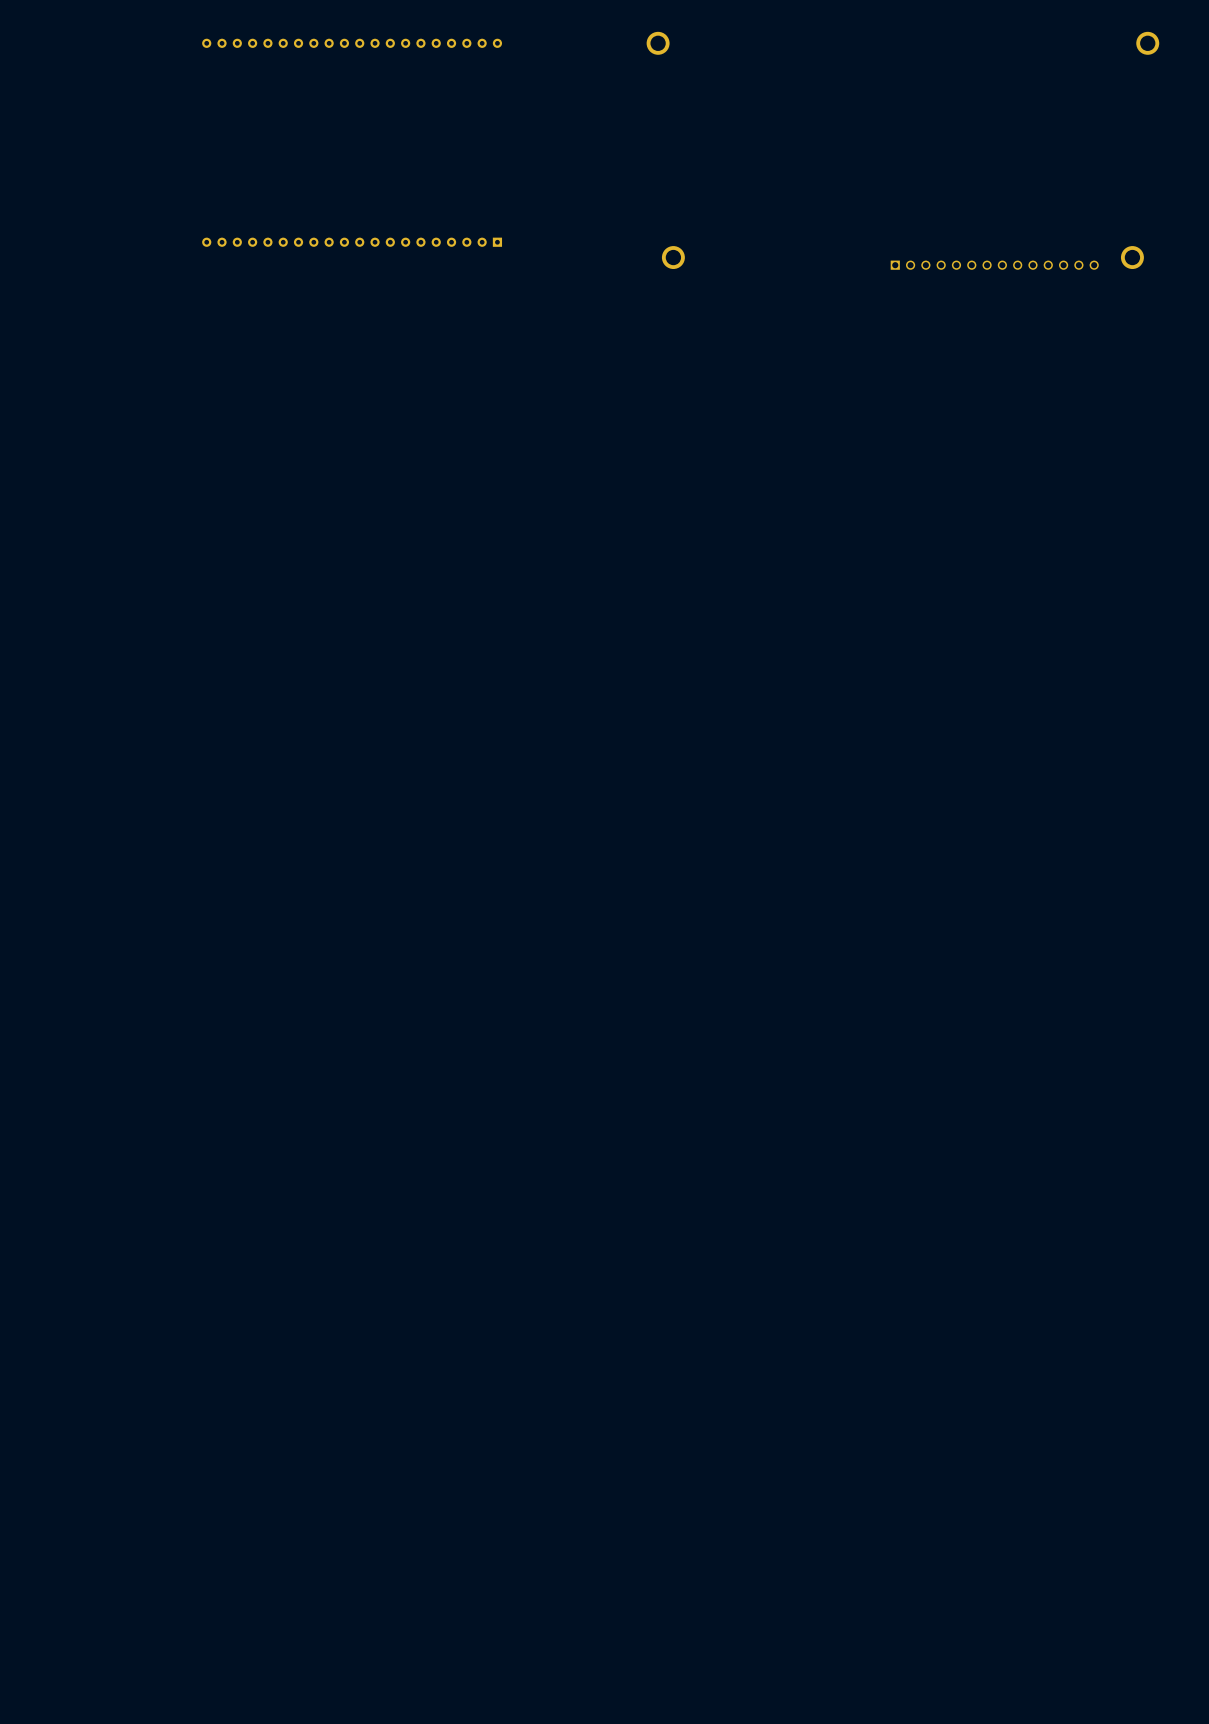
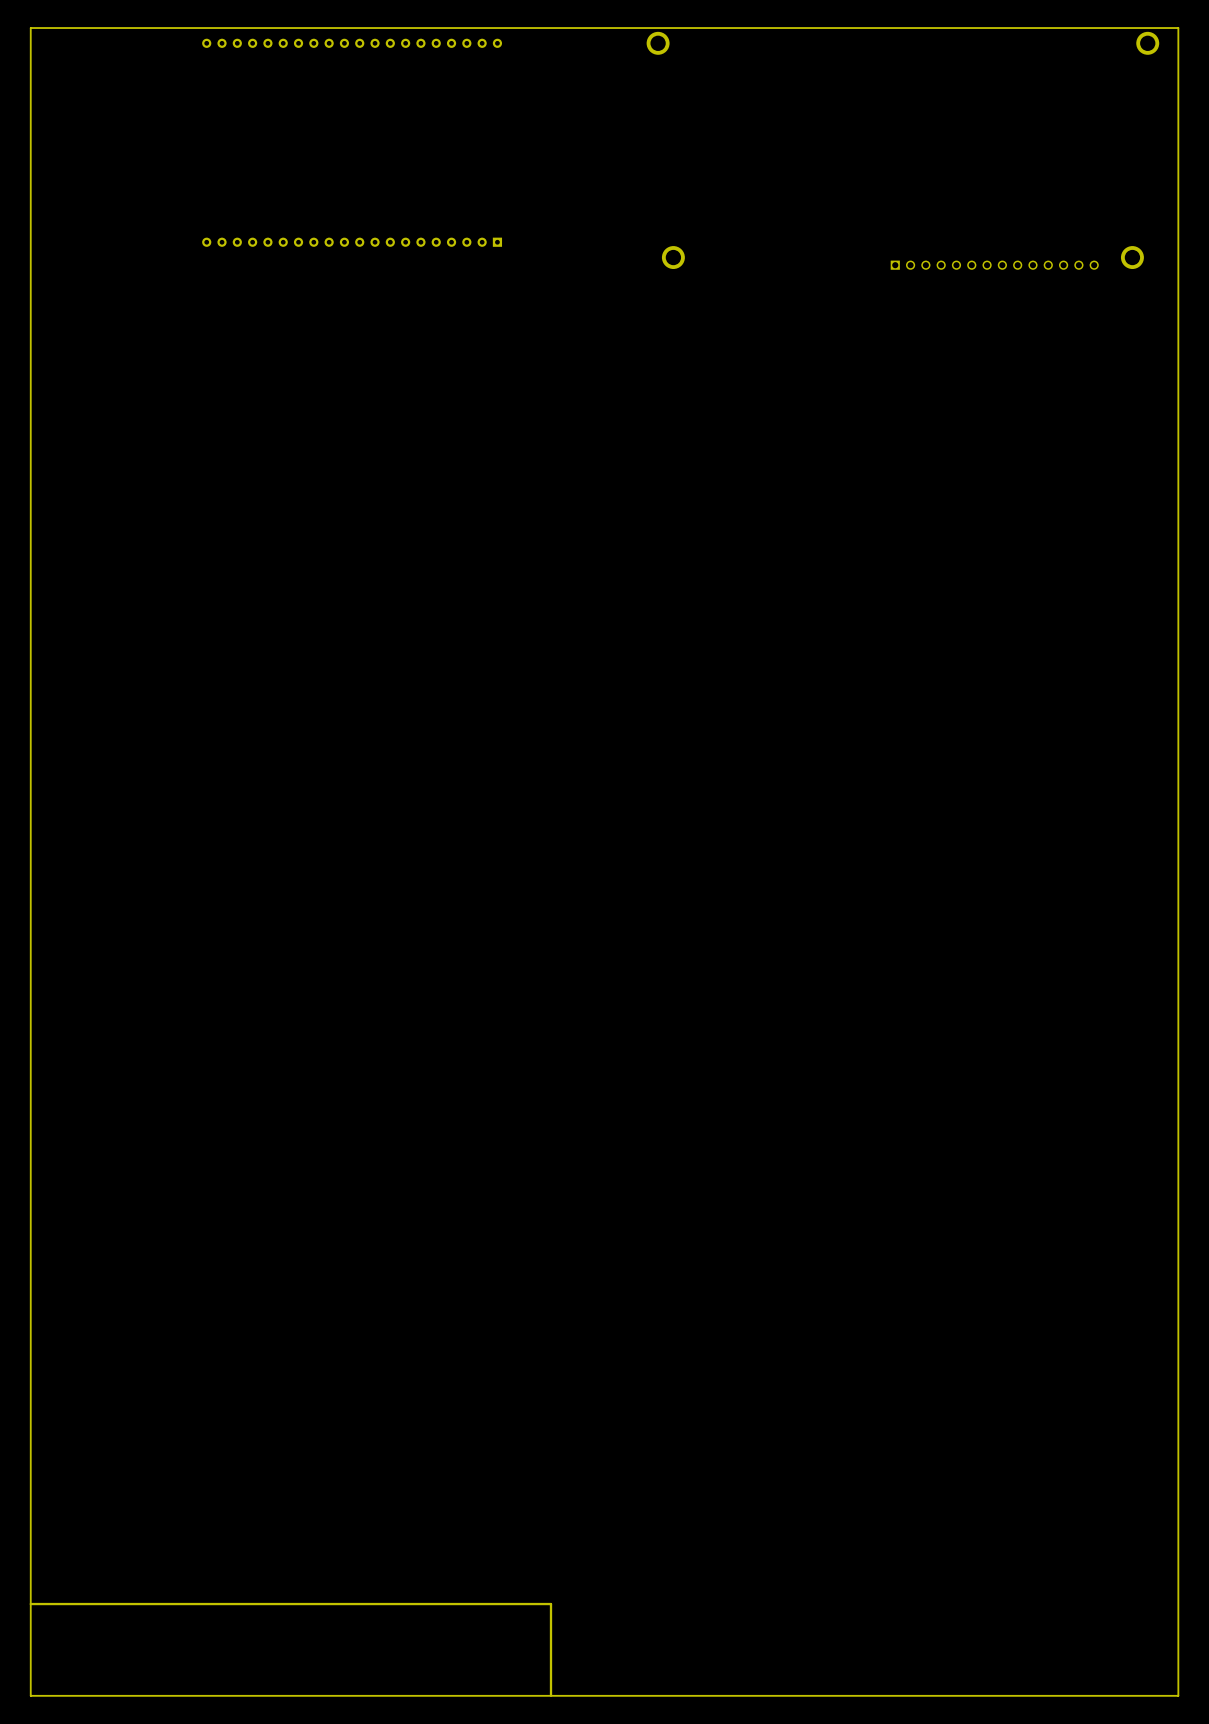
board edge: none -> (1178, 28) (30, 28) (30, 1695) (1178, 1695) (1178, 28)
board edge: none -> (30, 1604) (551, 1604) (551, 1695)

